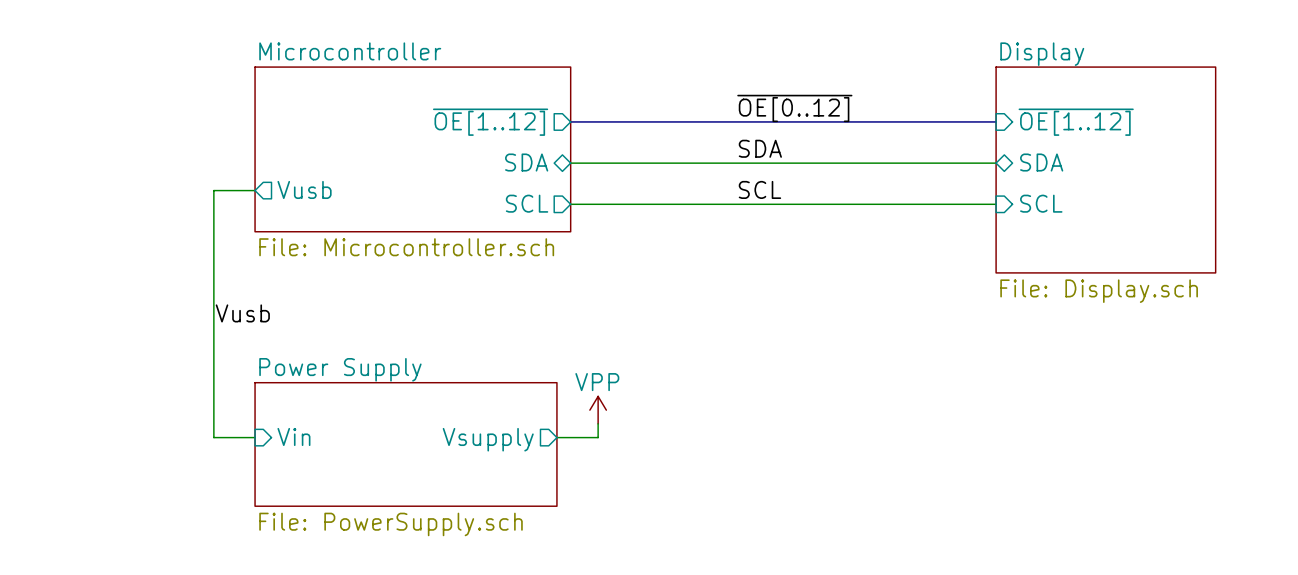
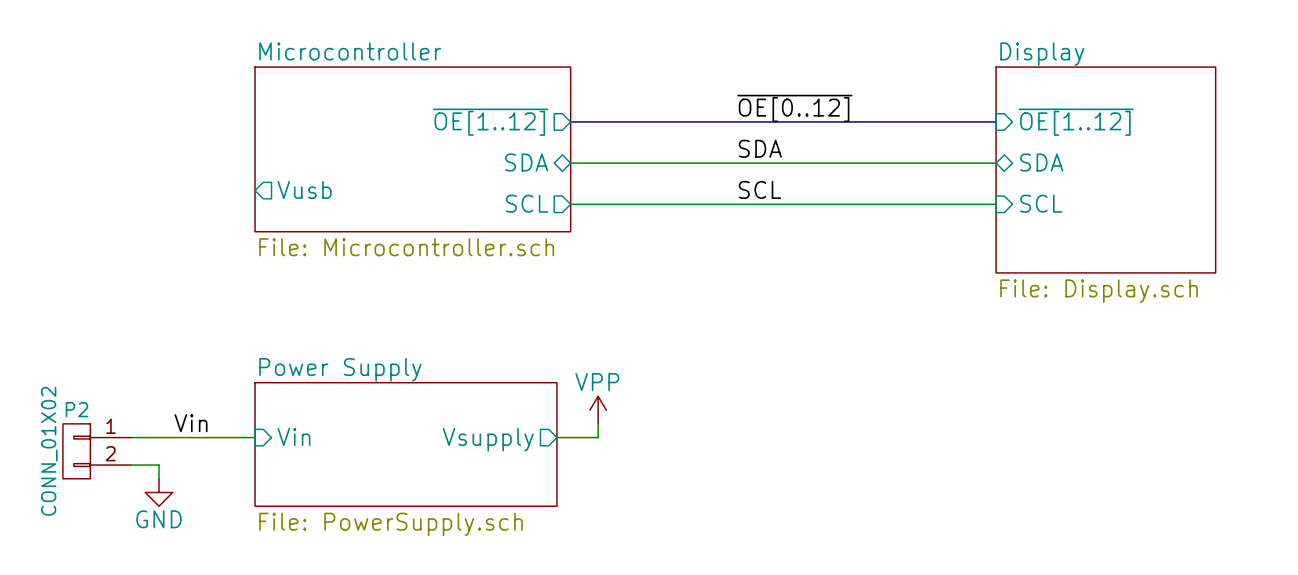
wire: (255, 190) (213, 190) (213, 437) -> (131, 437) (213, 437)
label: Vusb (242, 313) -> none
label: none -> Vin (191, 423)
P2: none -> CONN_01X02 (97, 451)
wire: none -> (131, 465) (158, 465) (158, 478)
power symbol: none -> GND (158, 492)

